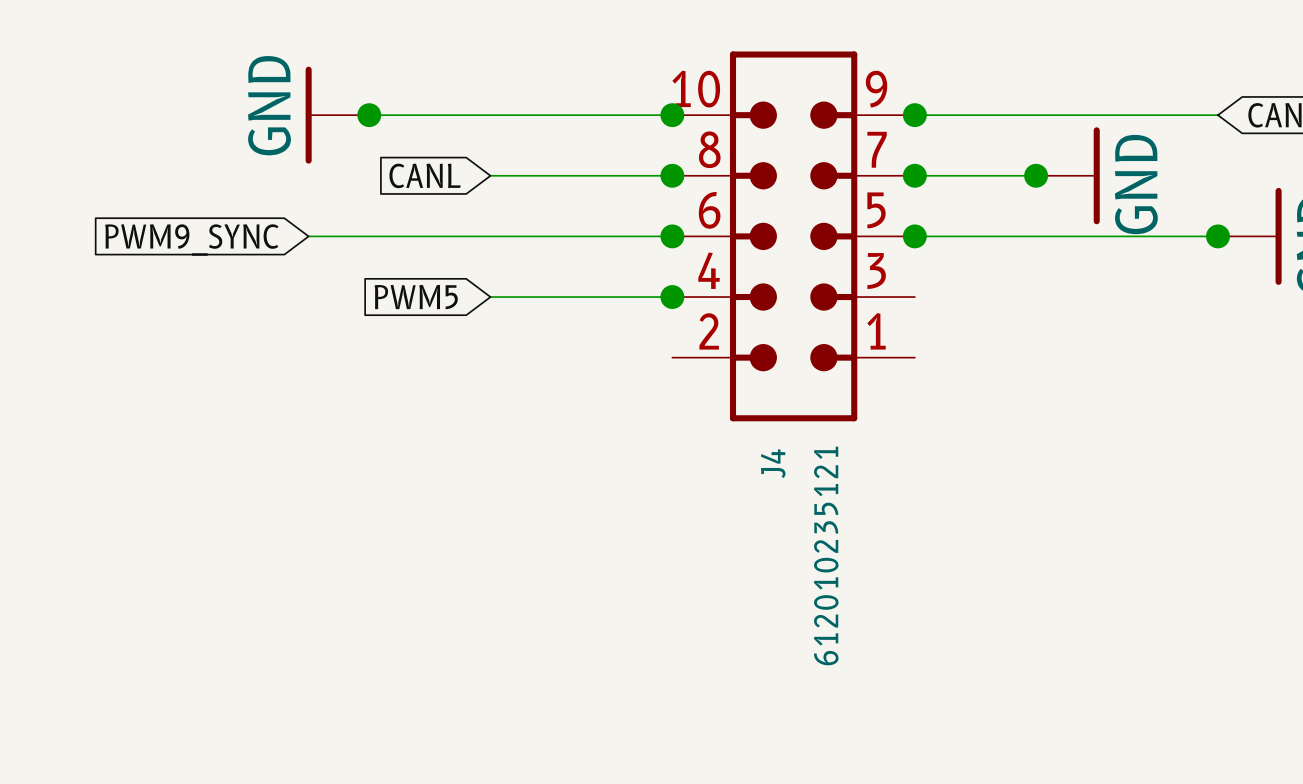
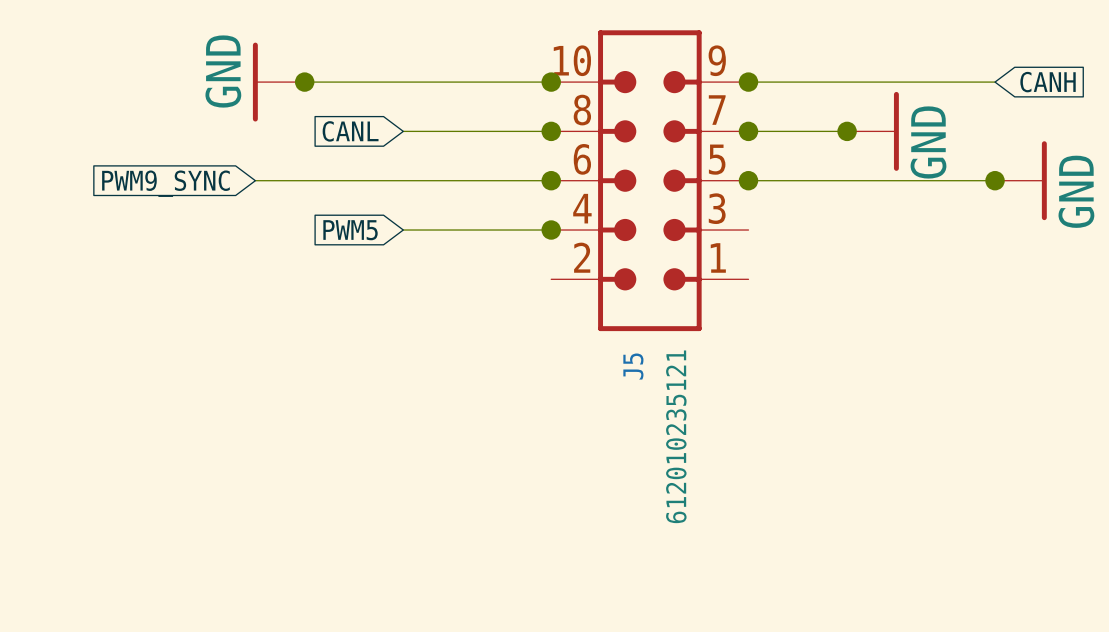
J4 name: J4 (773, 463) -> J5 (633, 366)

